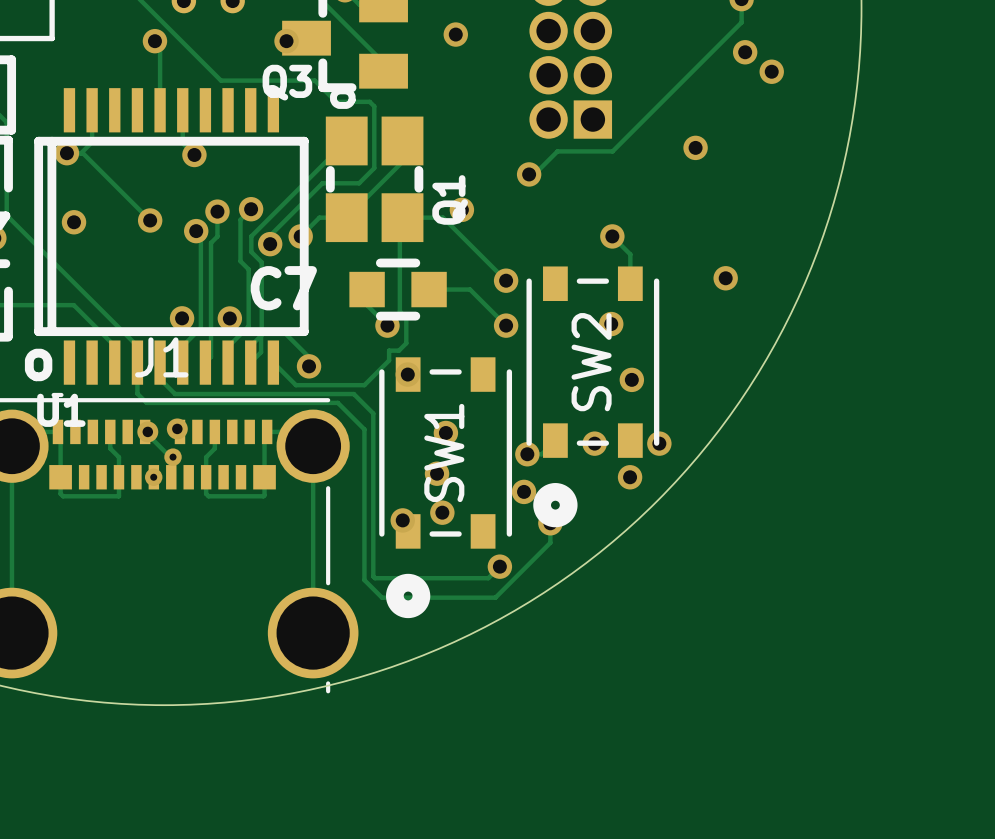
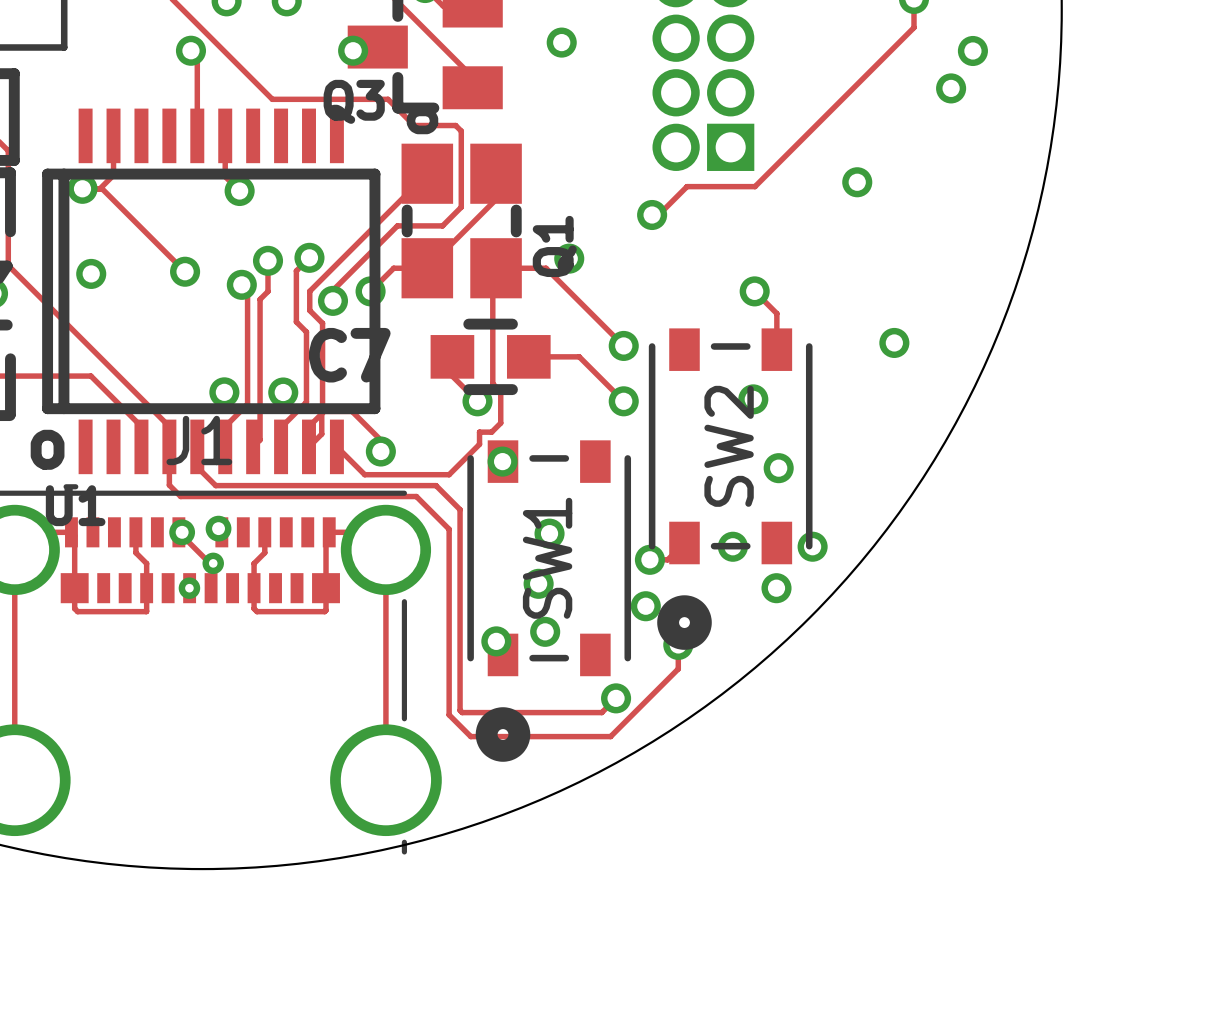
via position: (745, 52) -> (972, 50)

